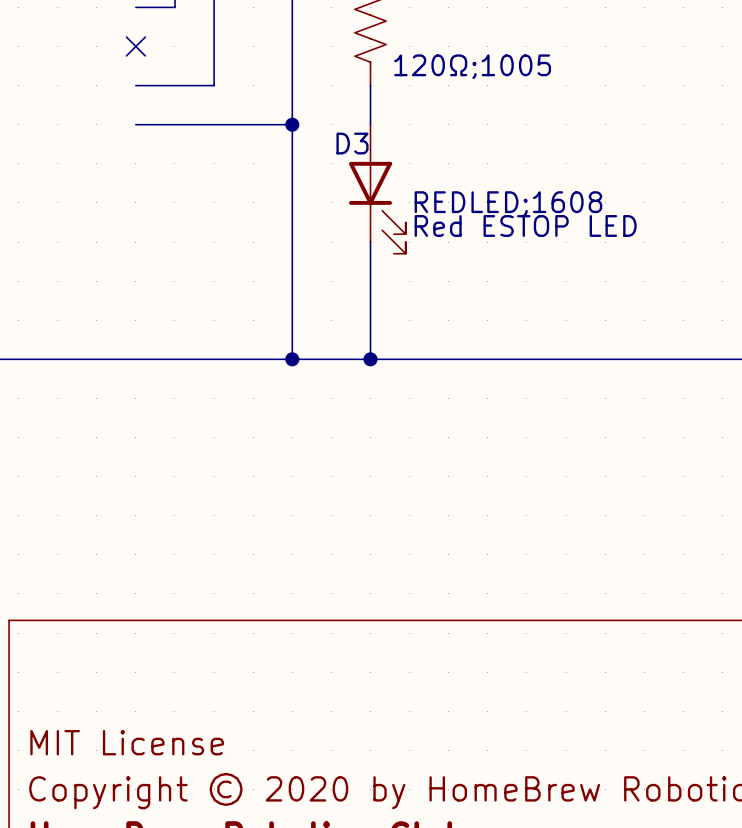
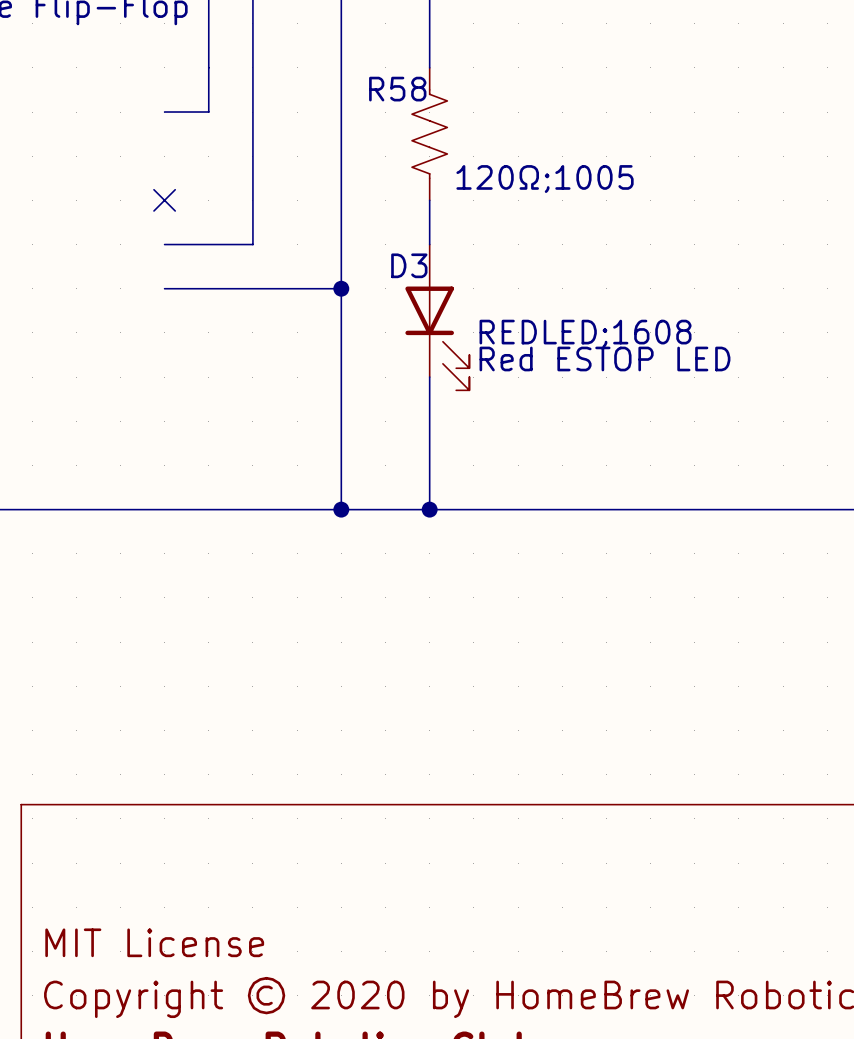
no-connect mark position: (135, 46) -> (164, 200)
wire: (135, 85) (214, 85) -> (252, 244) (252, 200)
wire: (214, 124) (292, 124) -> none
junction position: (292, 124) -> (341, 288)
wire: none -> (164, 288) (341, 288)

